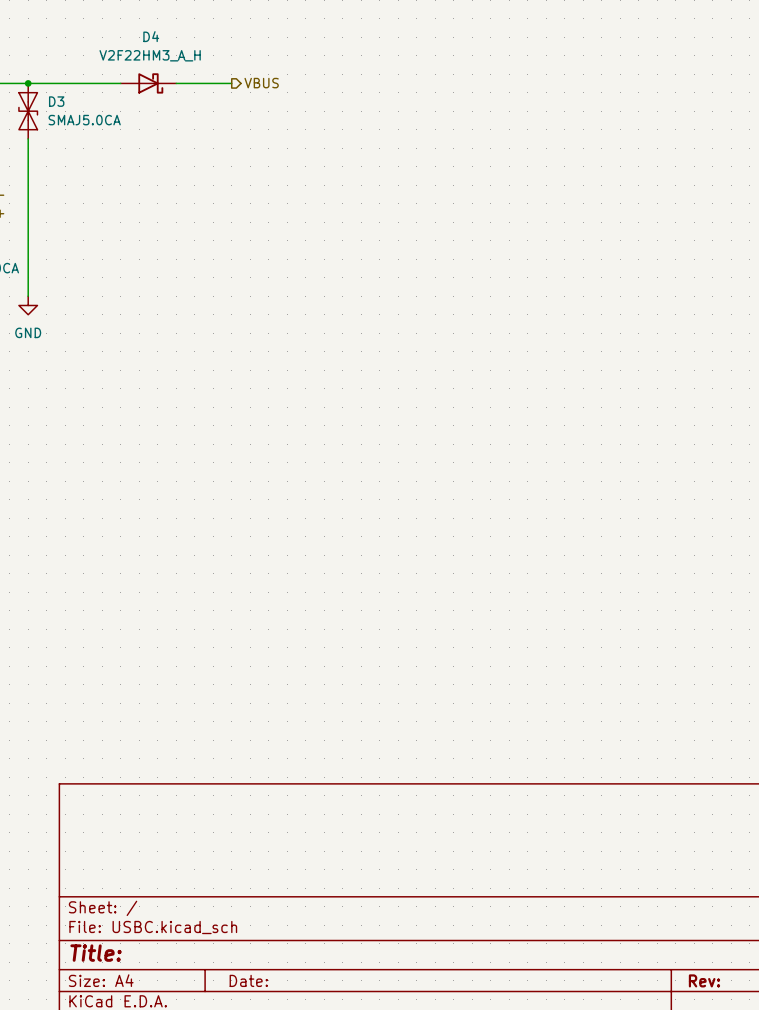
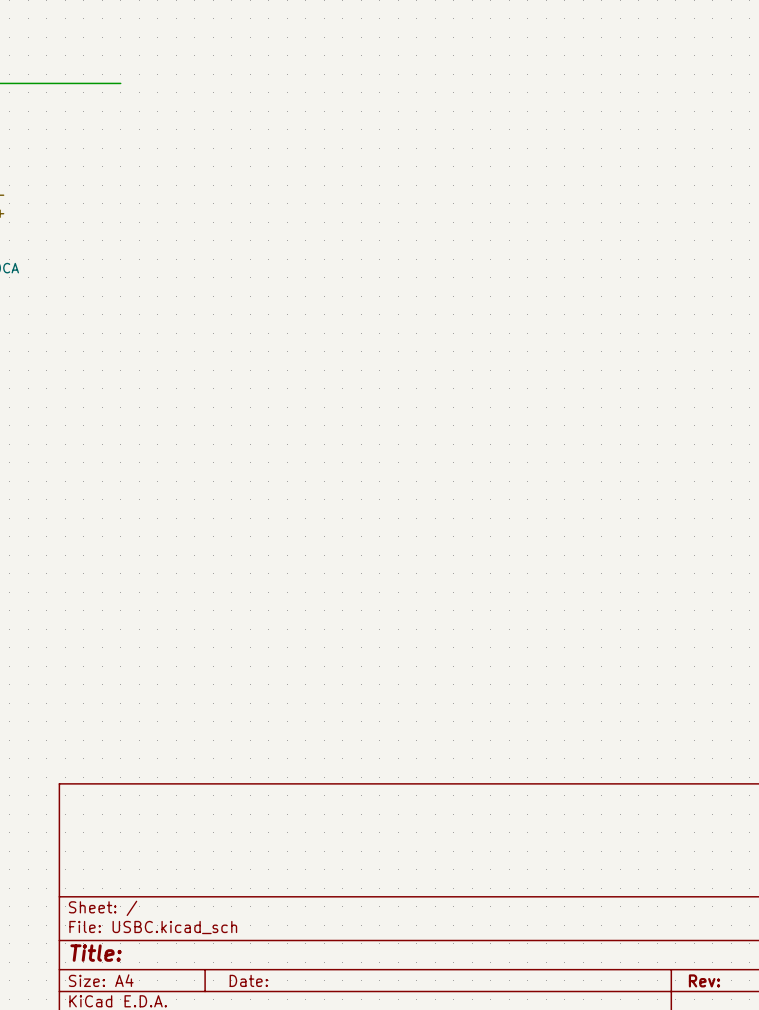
junction: (28, 83) -> none
D4: V2F22HM3_A_H (148, 83) -> none
wire: (176, 83) (231, 83) -> none
hierarchical label: VBUS (261, 83) -> none
D3: SMAJ5.0CA (28, 111) -> none
wire: (28, 138) (28, 296) -> none
power symbol: GND (28, 305) -> none

